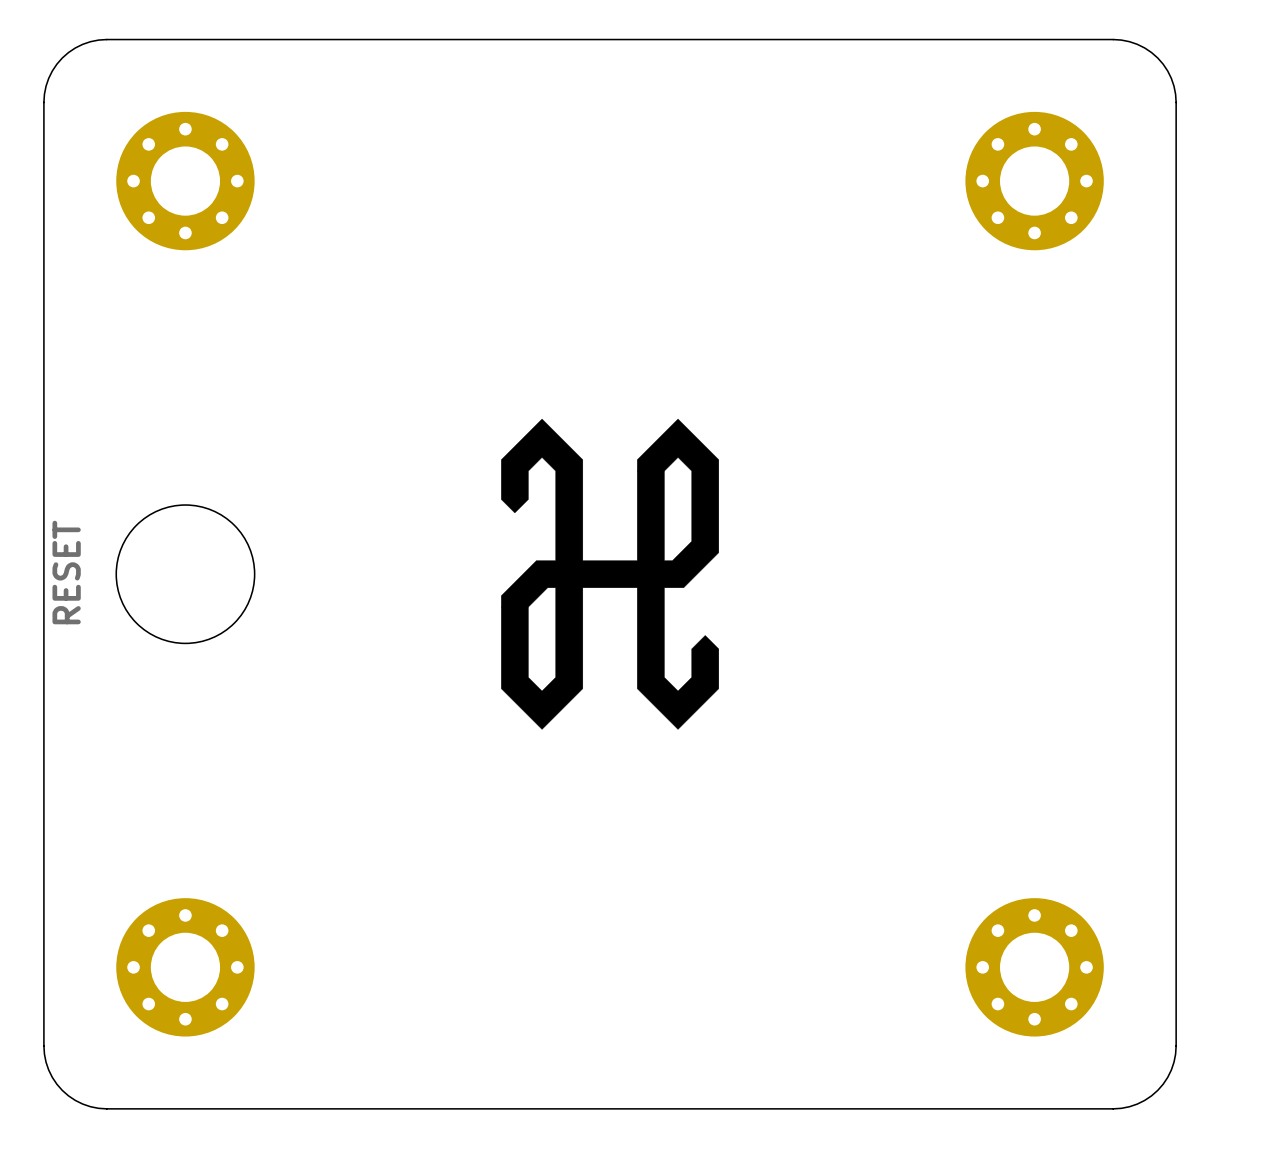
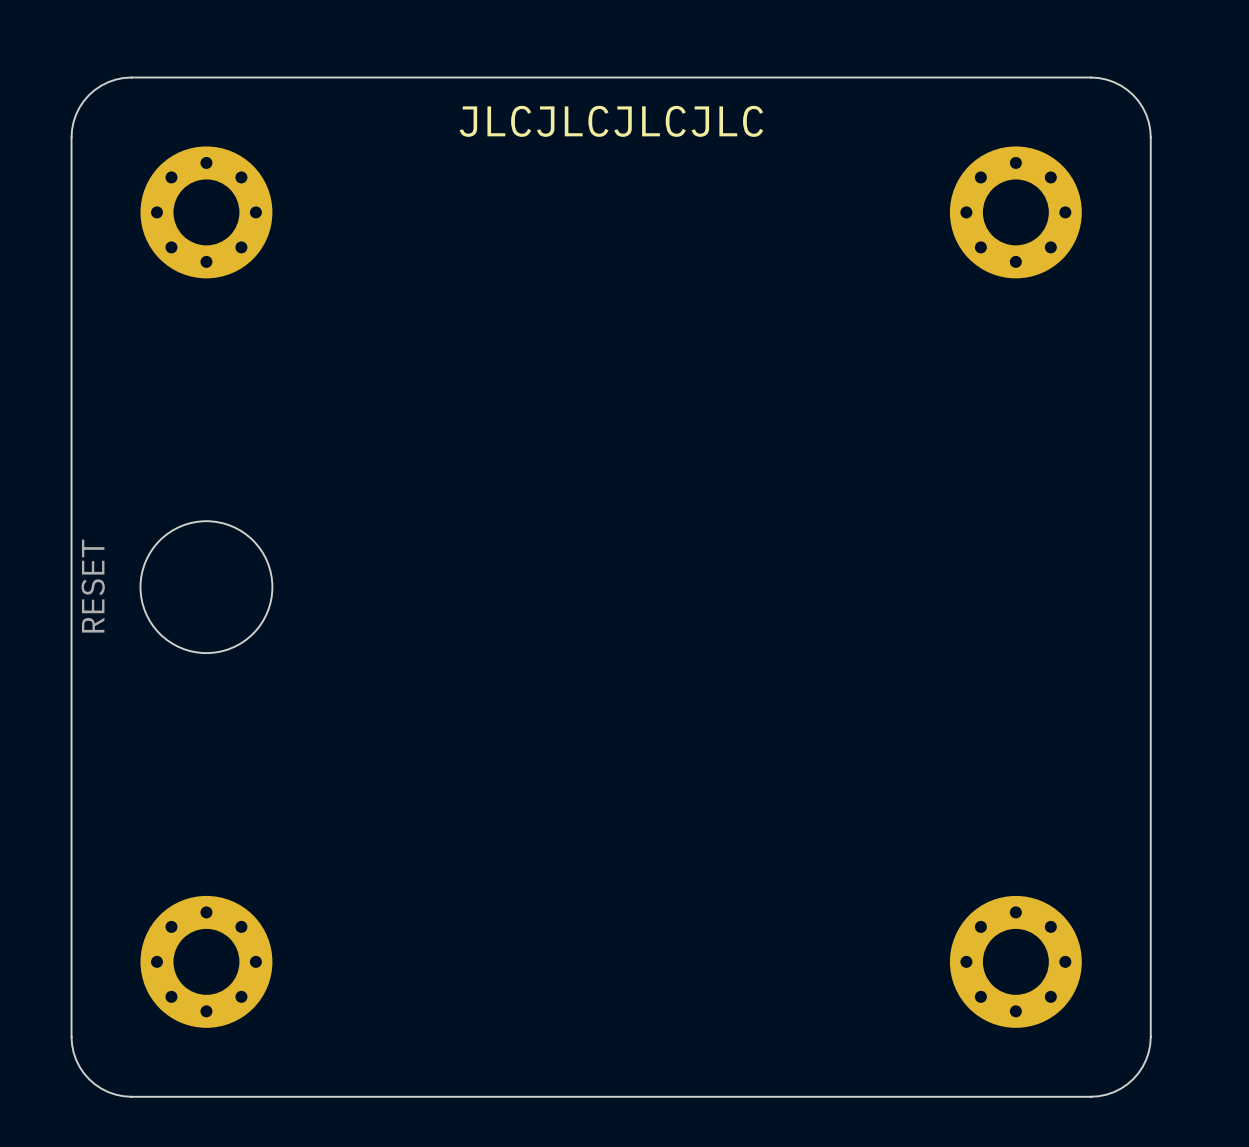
text: none -> JLCJLCJLCJLC (611, 121)
drawing: [501, 418, 720, 730] -> none

